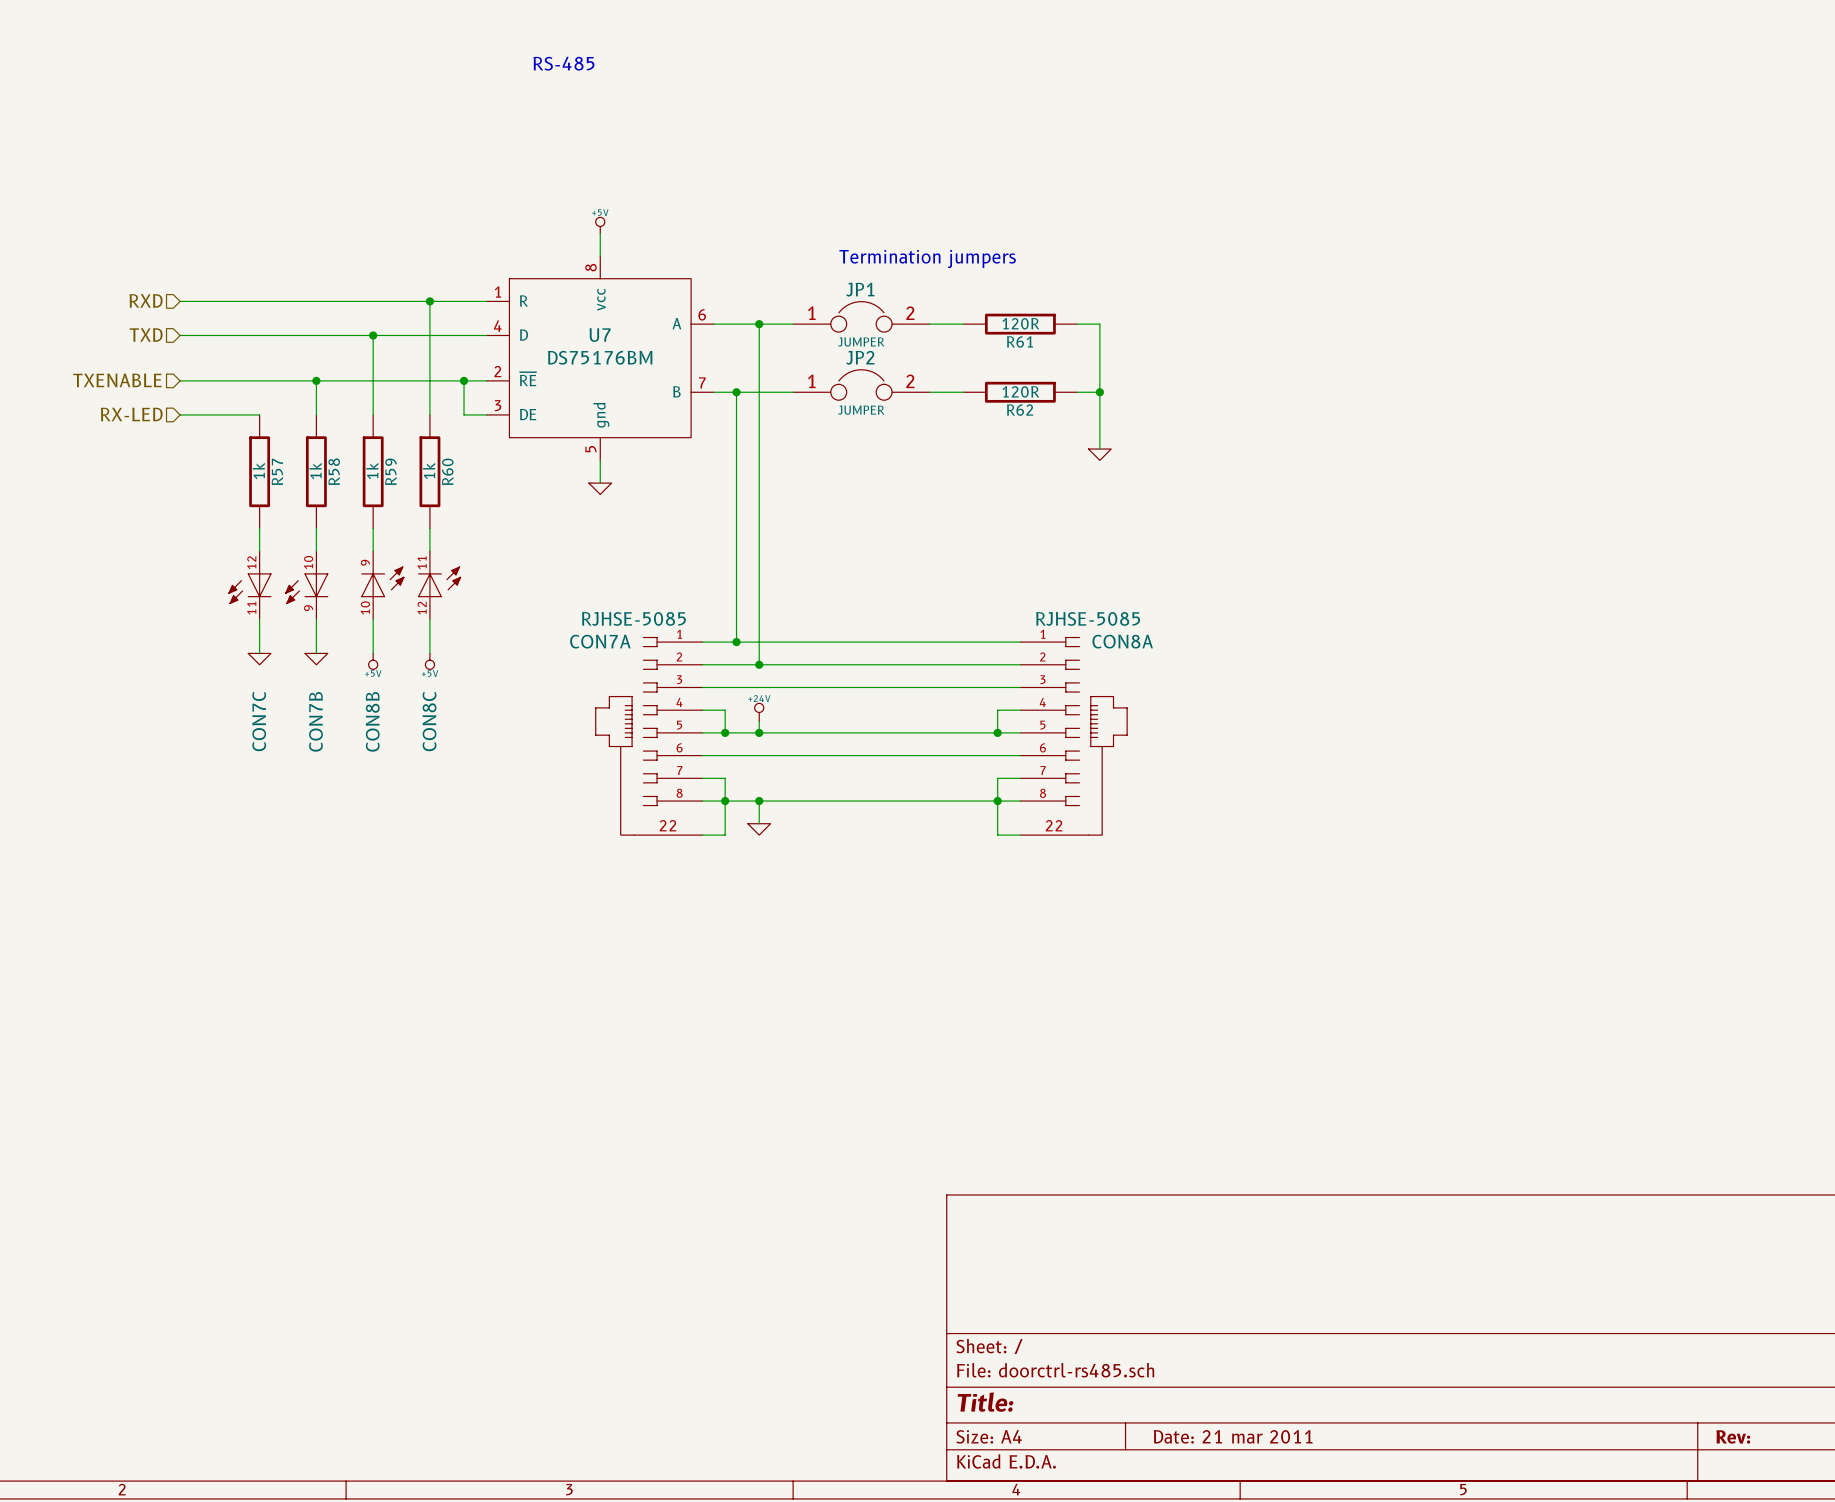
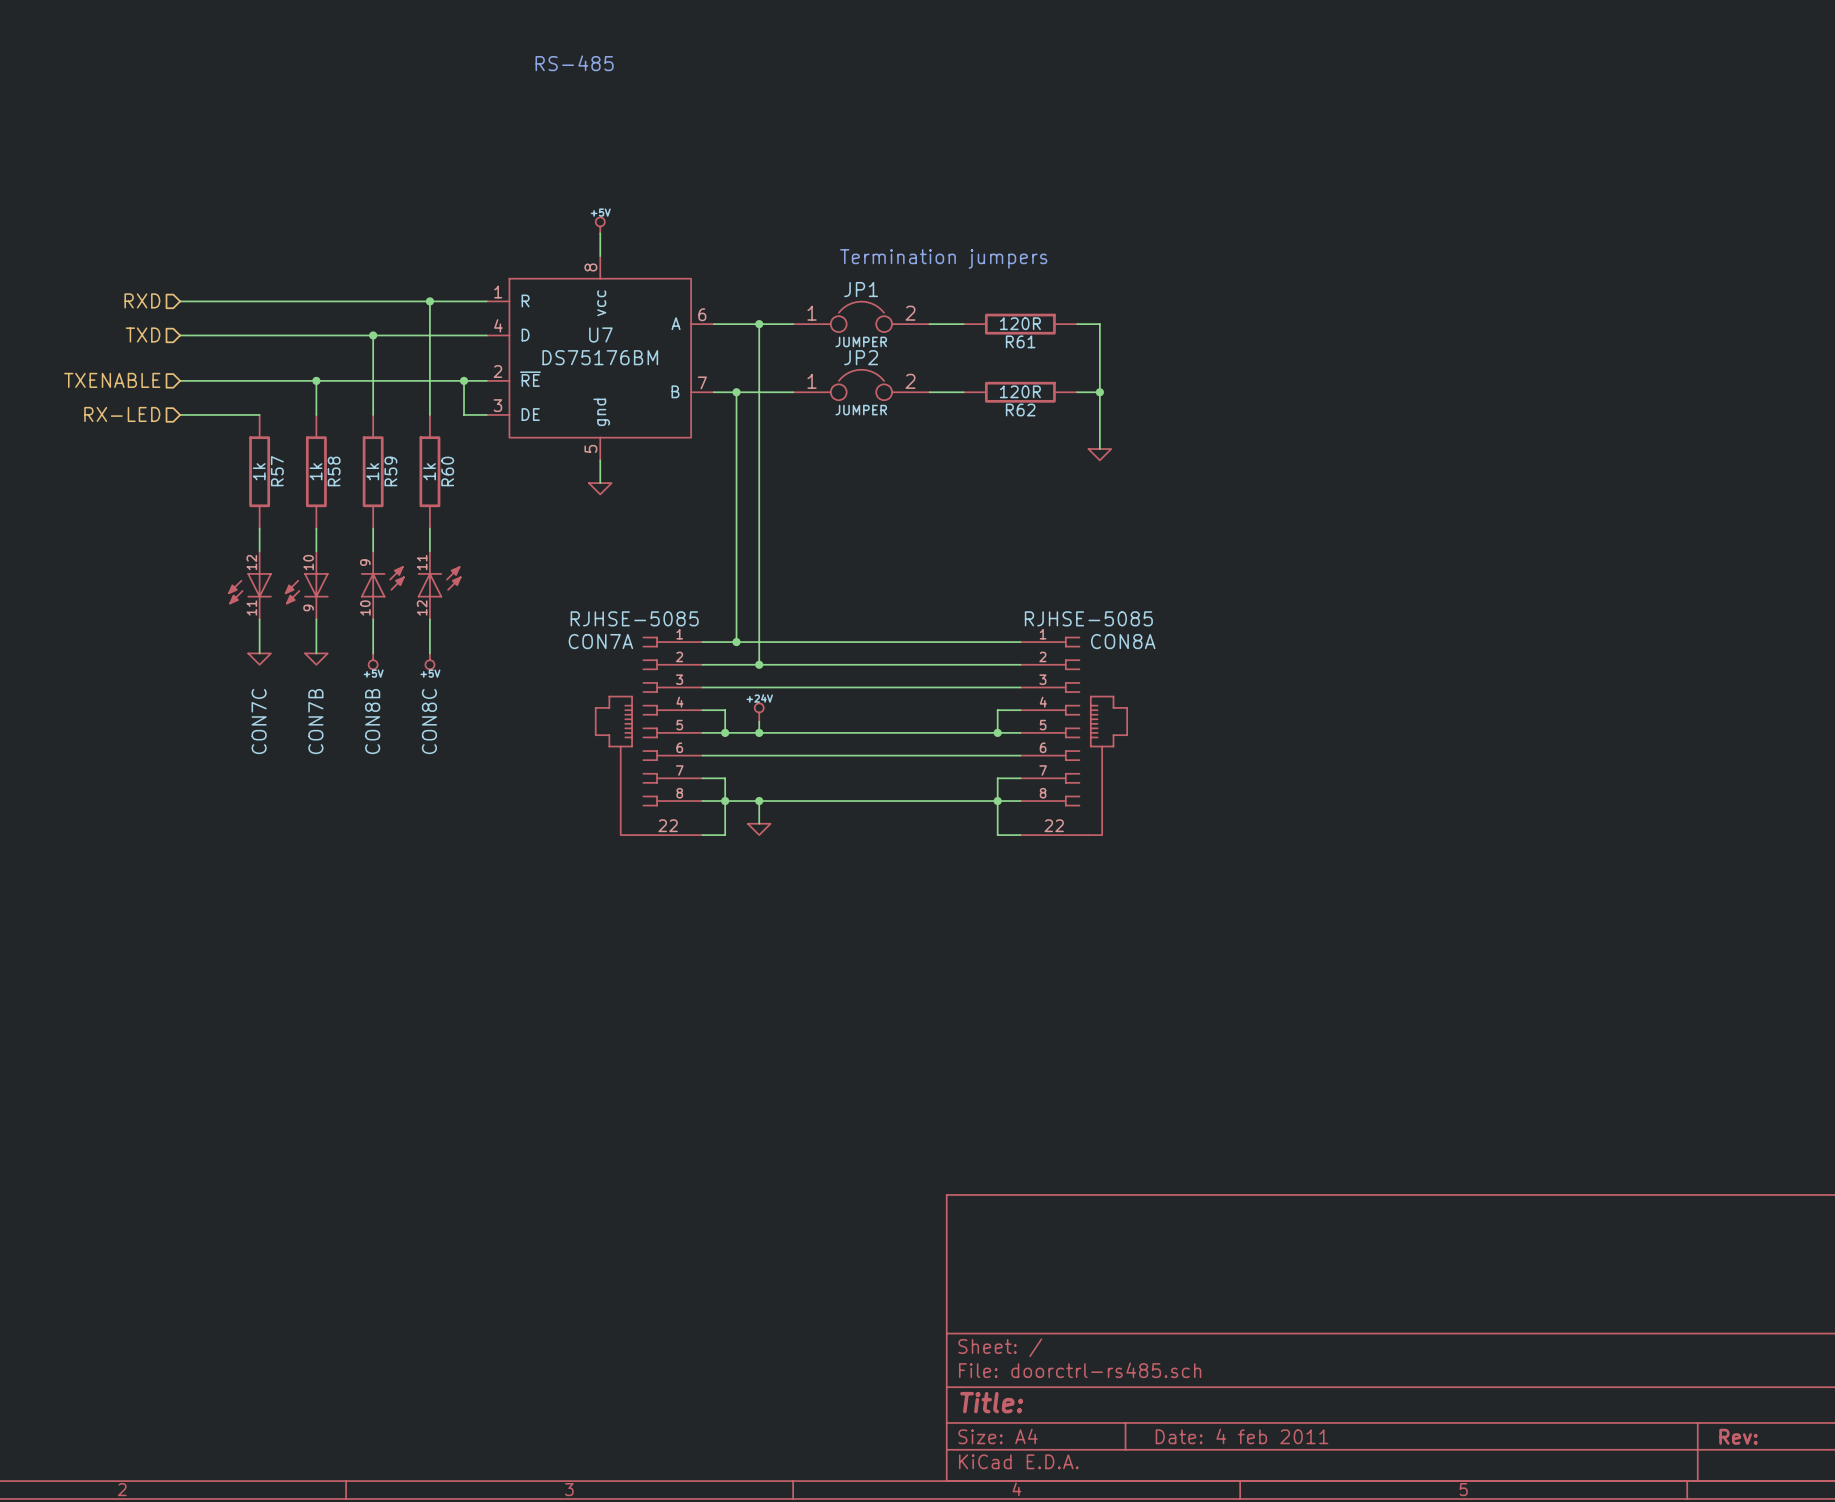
title block: Date: 21 mar 2011 (1233, 1436) -> Date: 4 feb 2011 (1242, 1436)

